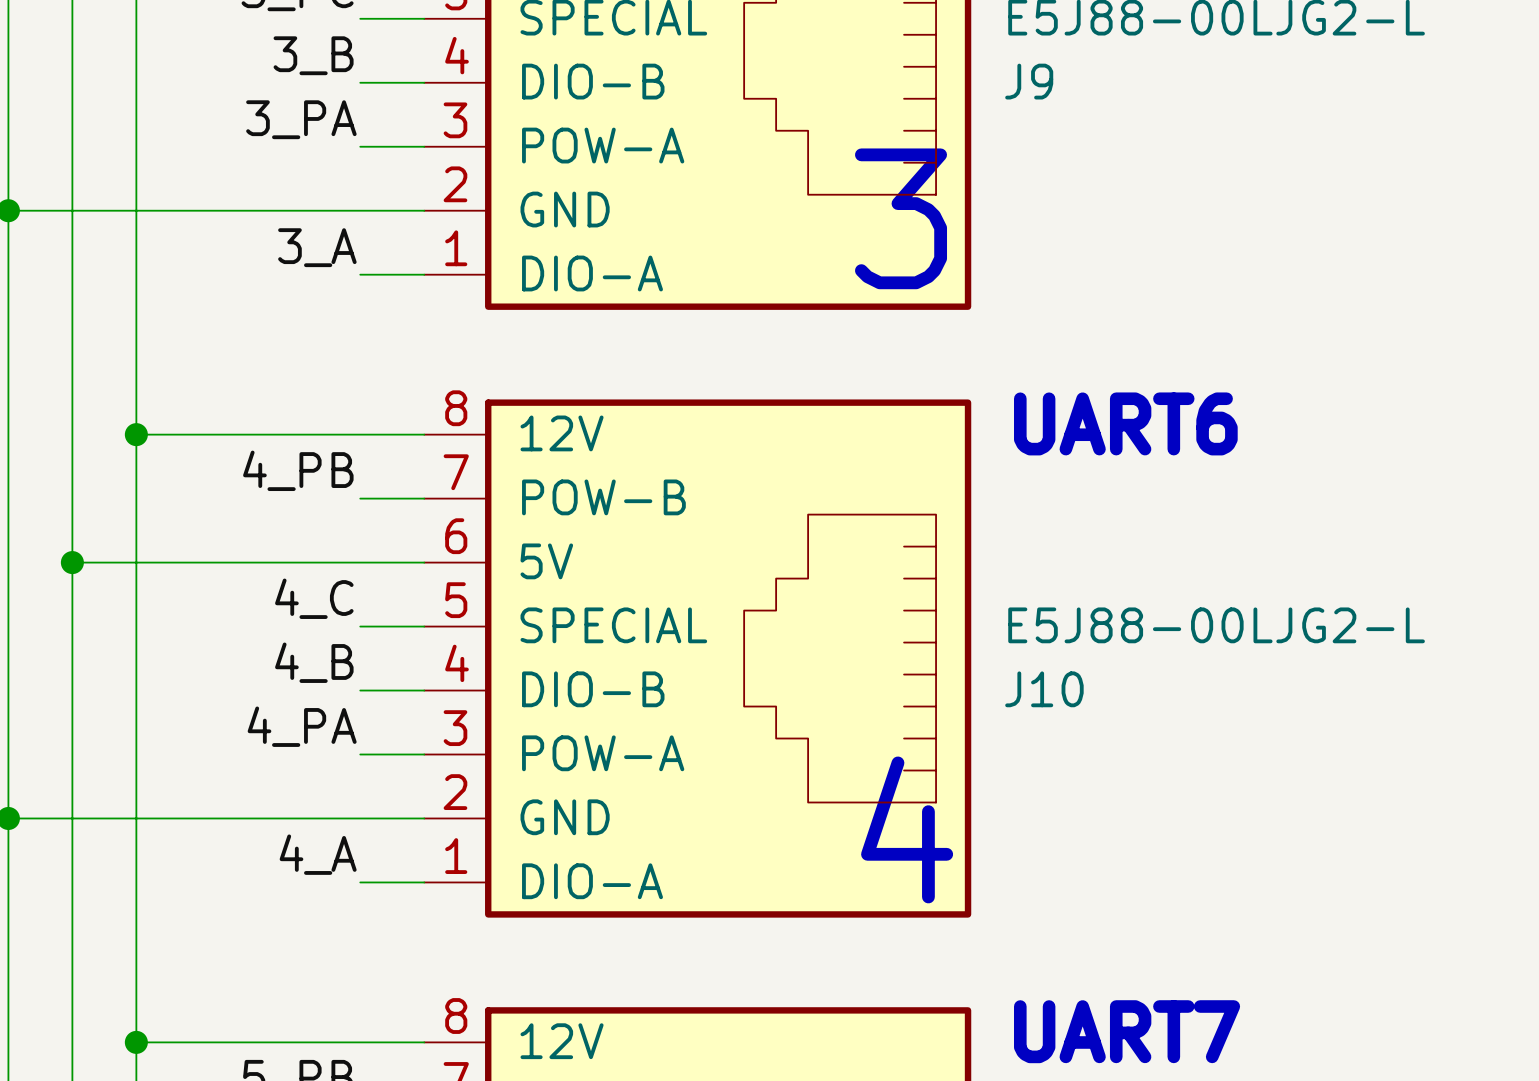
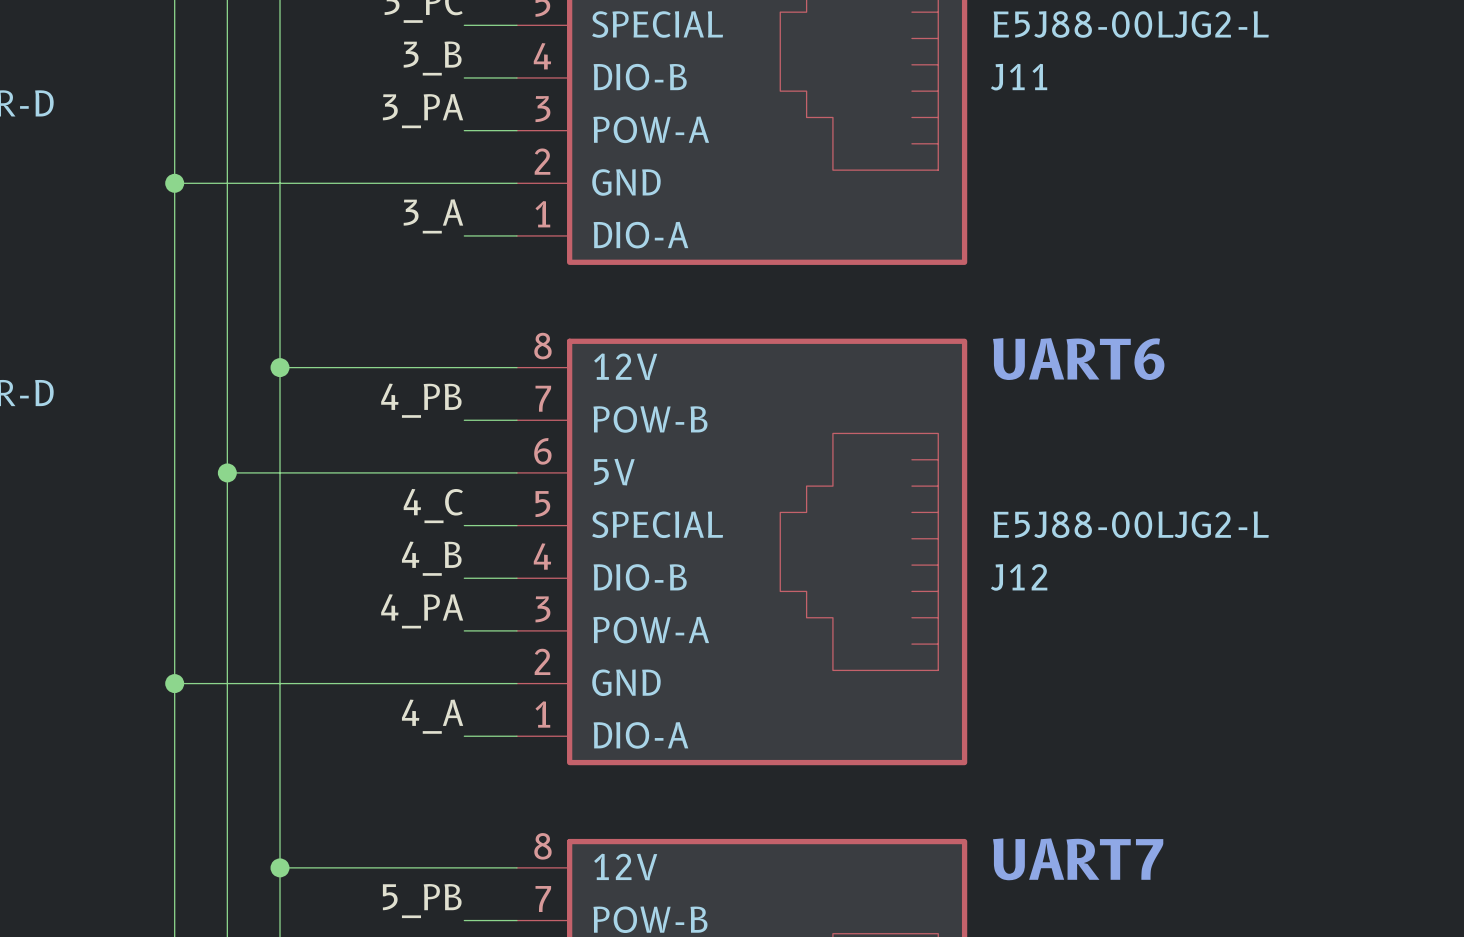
J9 name: J9 (1029, 81) -> J11 (1019, 77)
text: 3 (901, 218) -> none
J10 name: J10 (1044, 689) -> J12 (1019, 577)
text: 4 (907, 829) -> none

